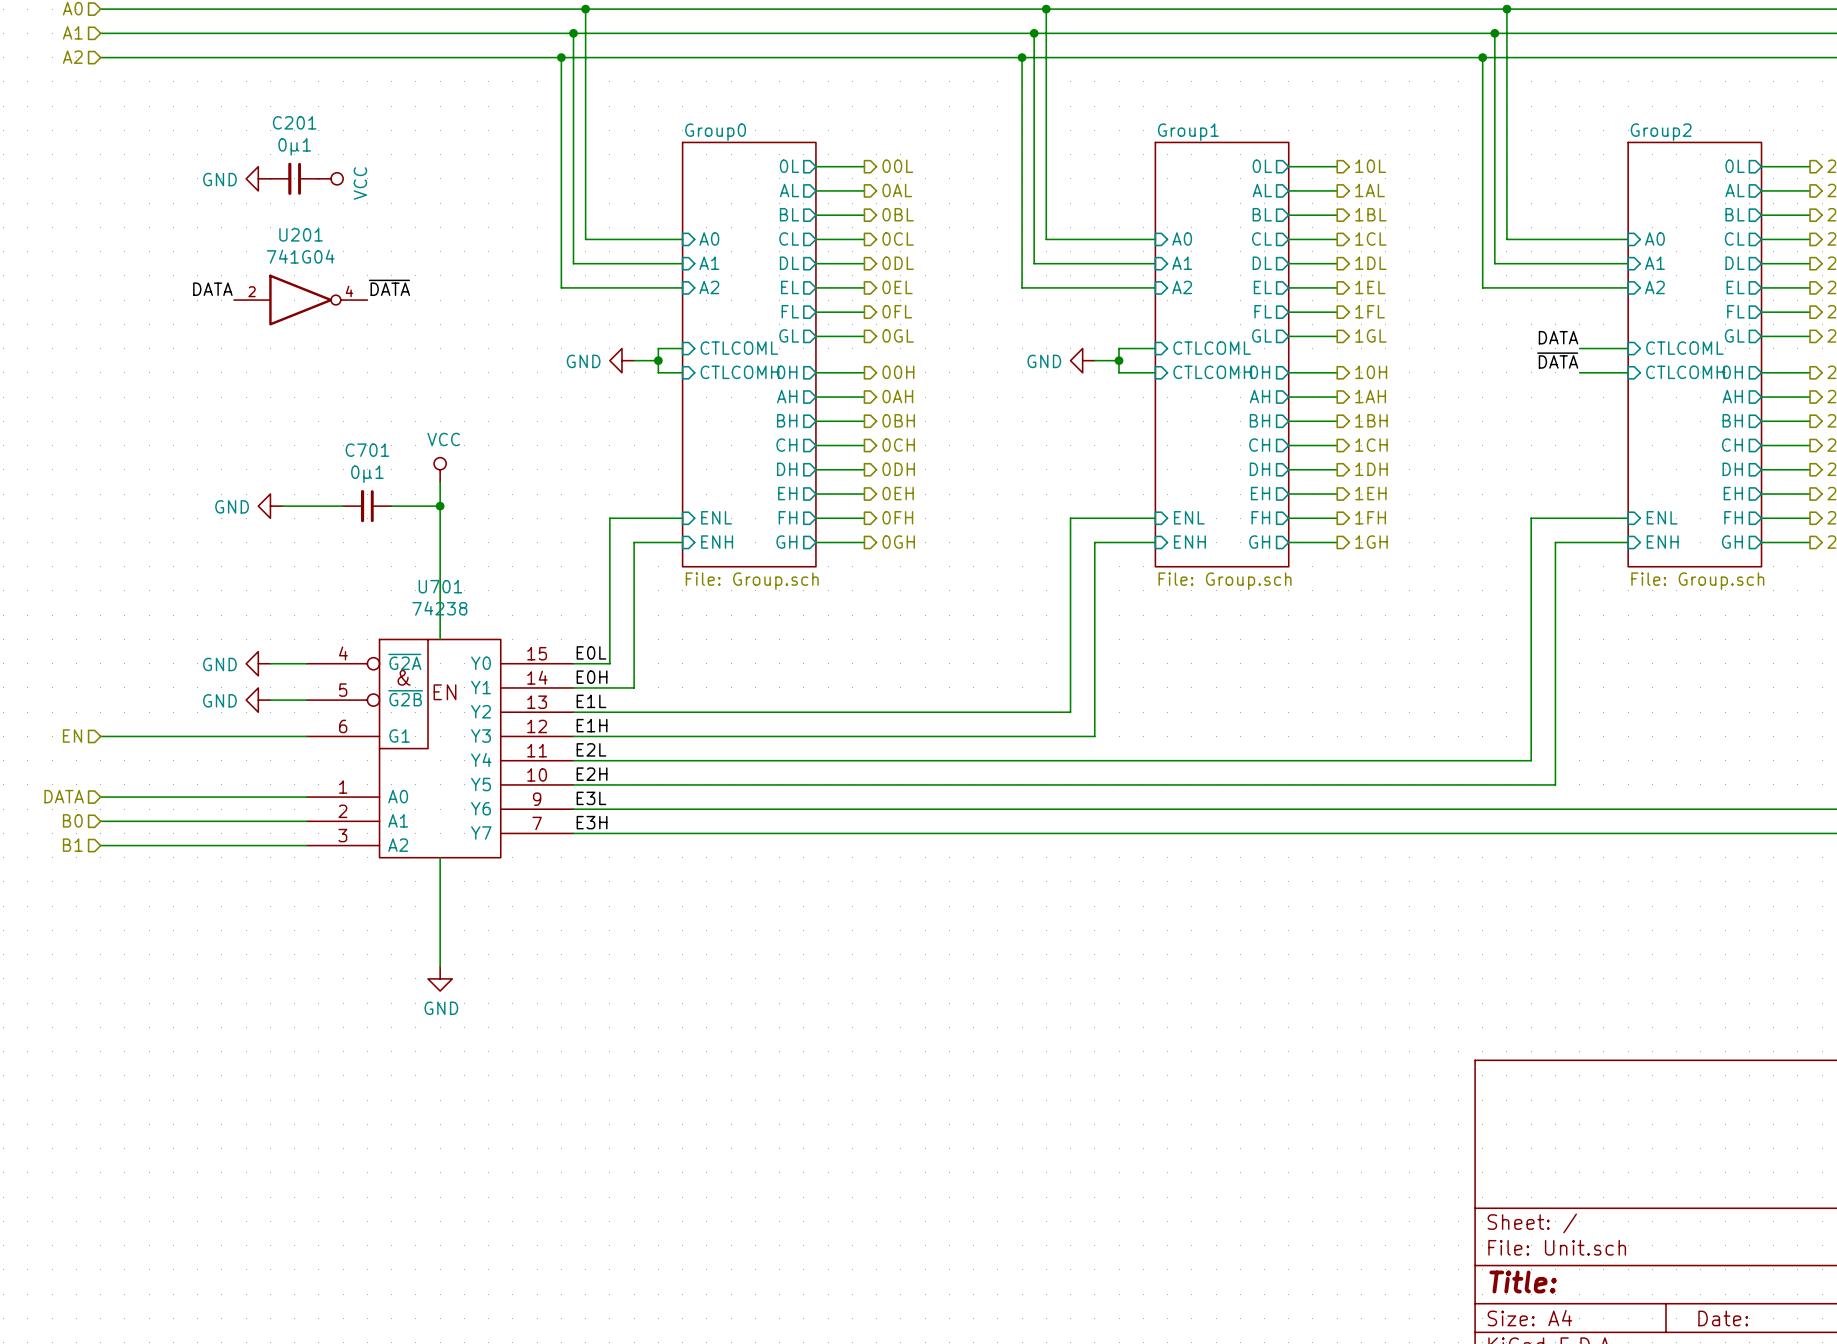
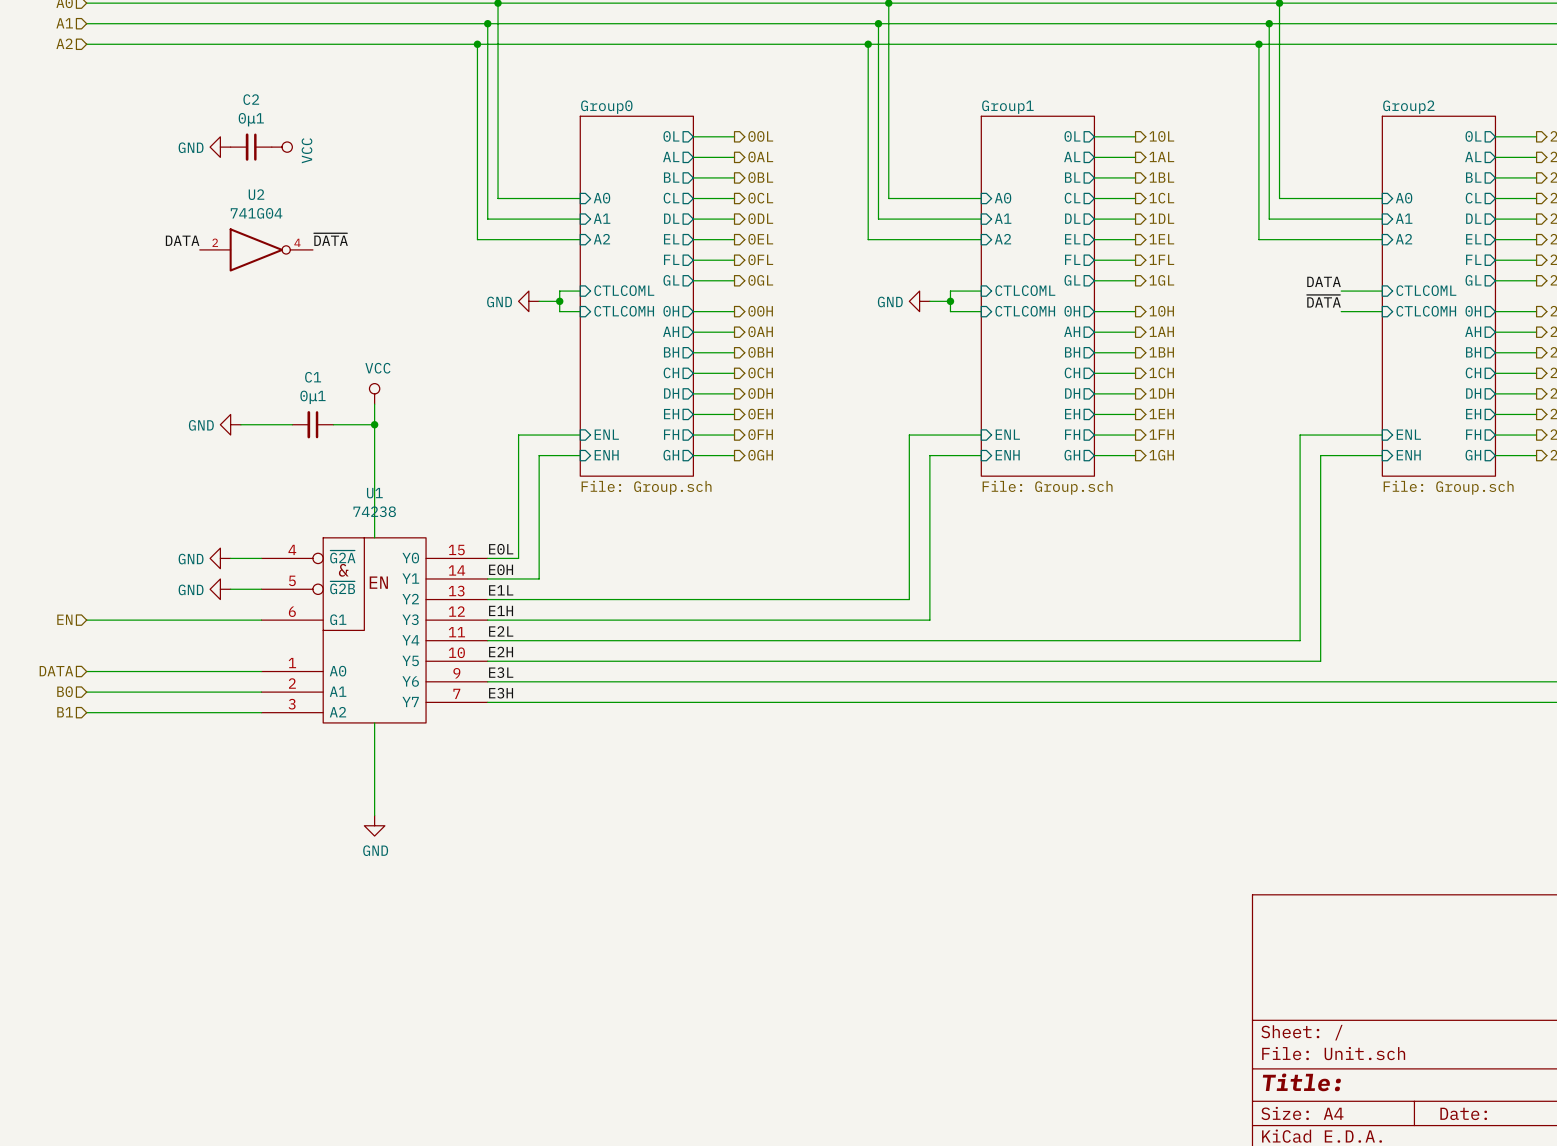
C201 name: C201 (294, 122) -> C2 (251, 99)
U201 name: U201 (301, 234) -> U2 (256, 194)
C701 name: C701 (367, 450) -> C1 (313, 377)
U701 name: U701 (440, 586) -> U1 (374, 493)

